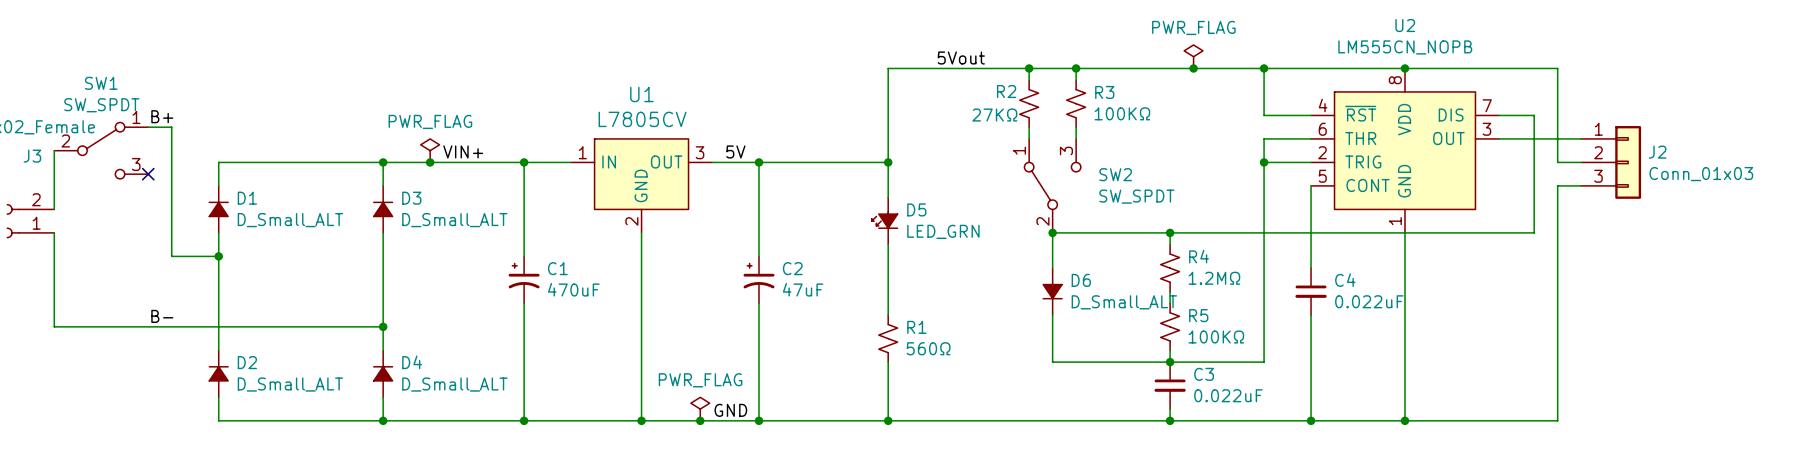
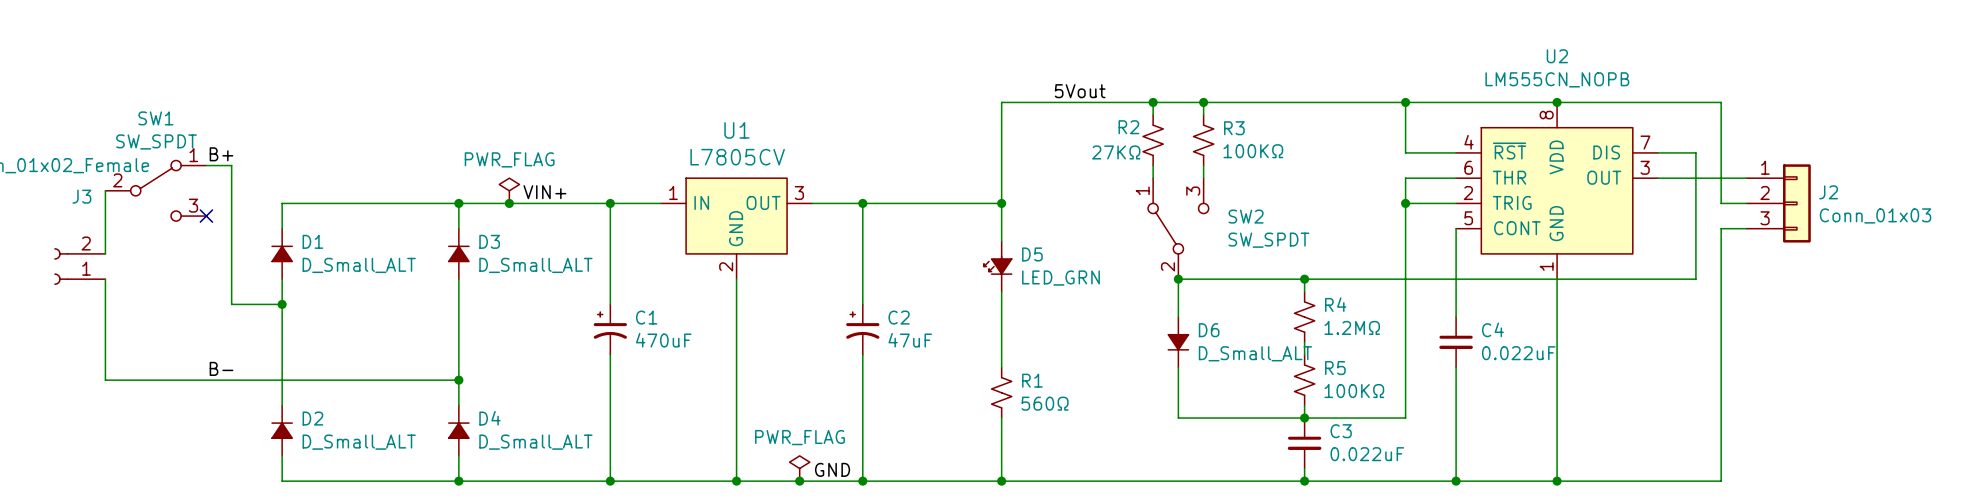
power symbol: PWR_FLAG (1193, 56) -> none
junction: (1193, 68) -> none
label: 5V (735, 151) -> none

